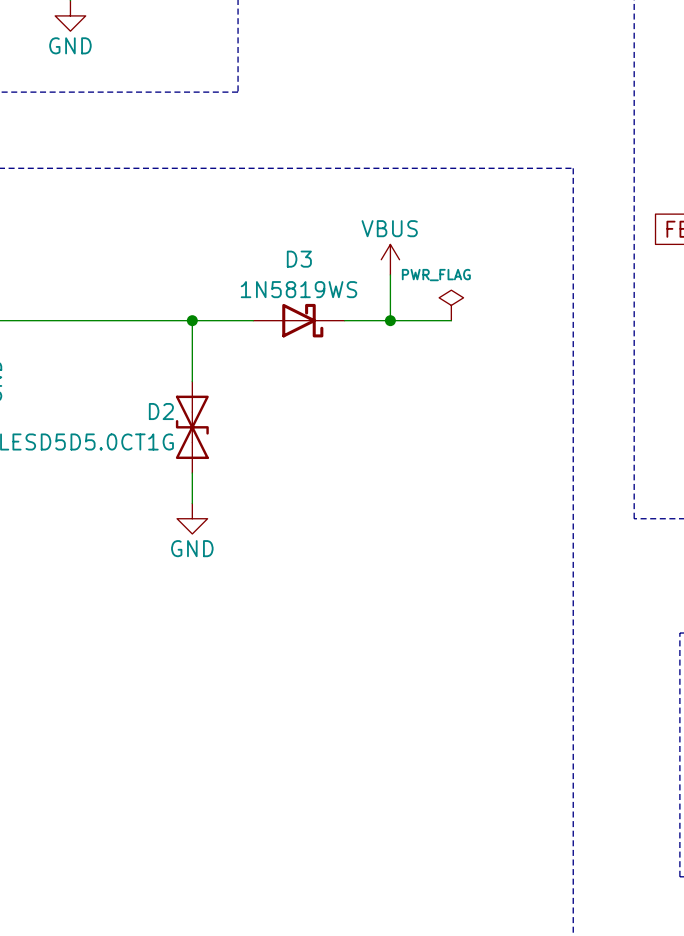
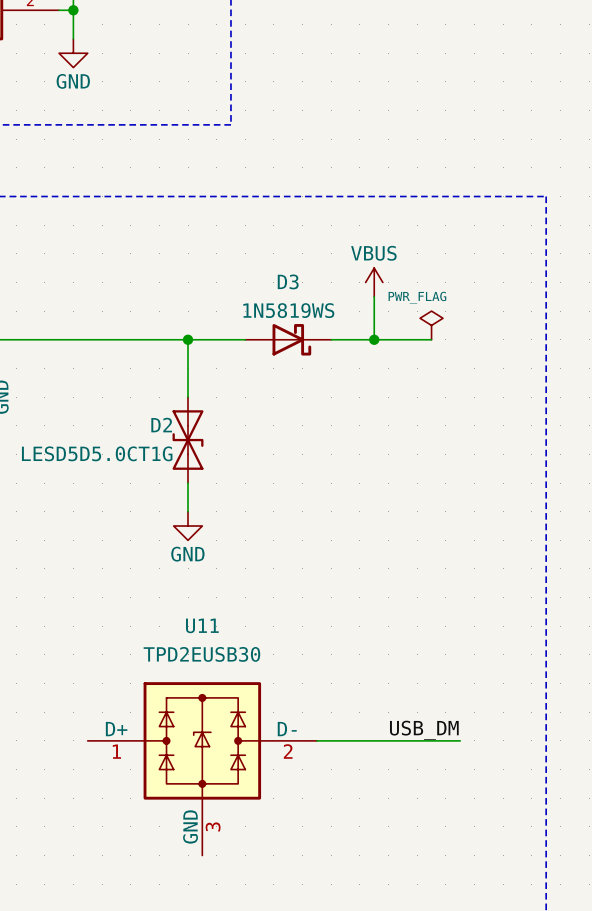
label: none -> USB_DM (424, 730)
wire: none -> (316, 740) (460, 740)
U11: none -> TPD2EUSB30 (202, 768)

